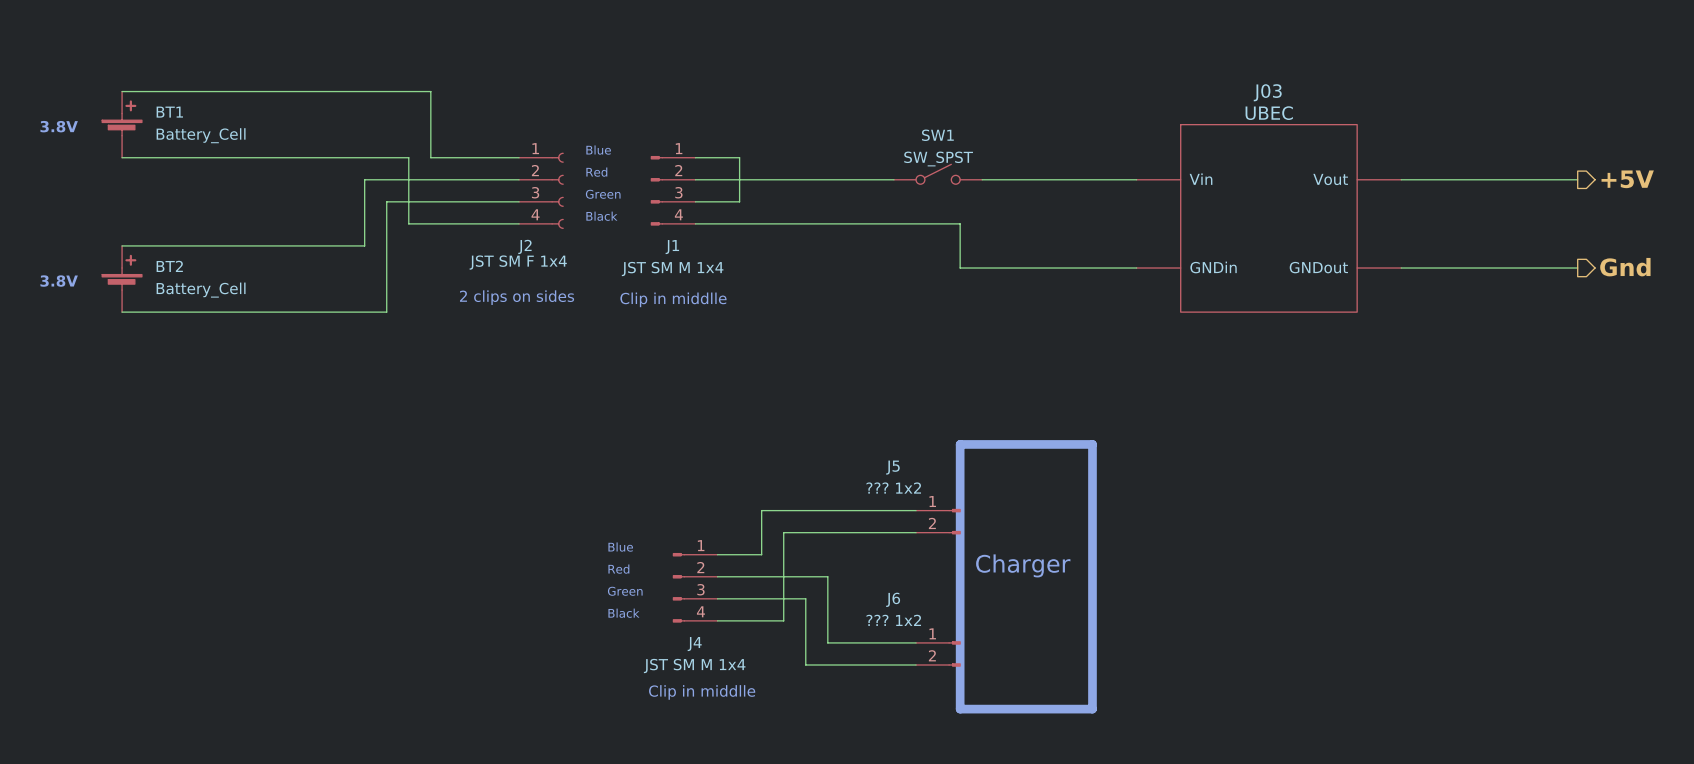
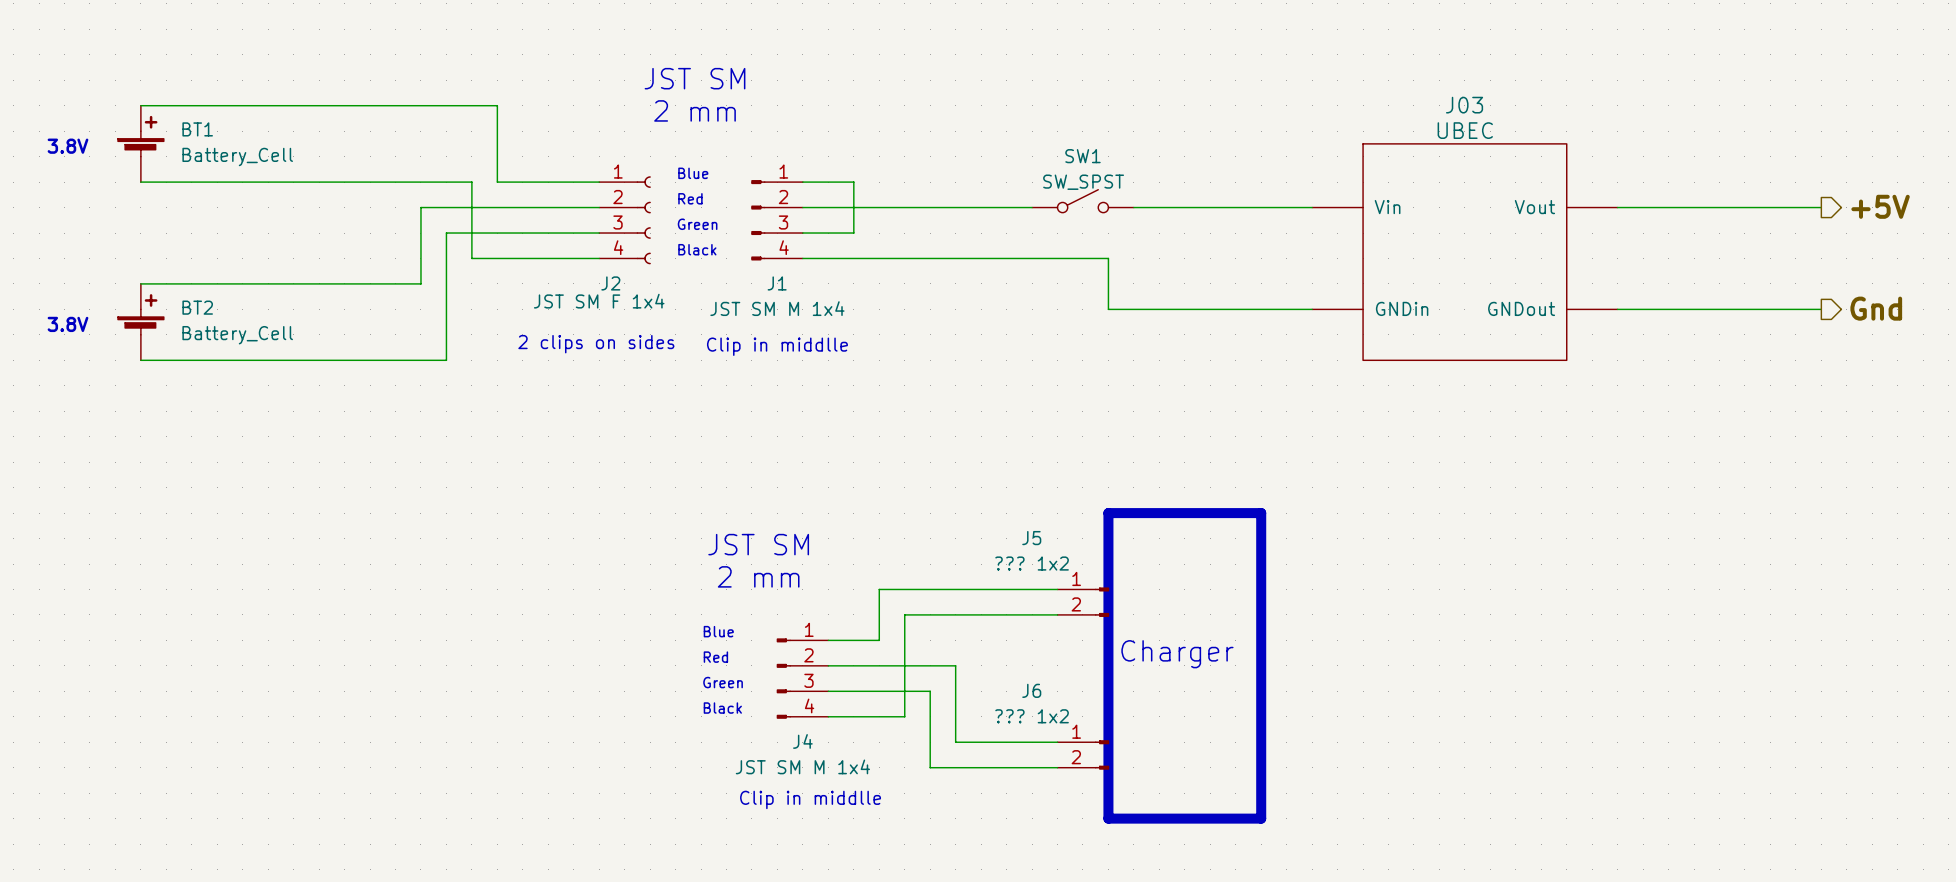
text: none -> JST SM (695, 78)
text: none -> 2 mm (695, 110)
text: none -> JST SM (758, 544)
text: none -> 2 mm (758, 576)

